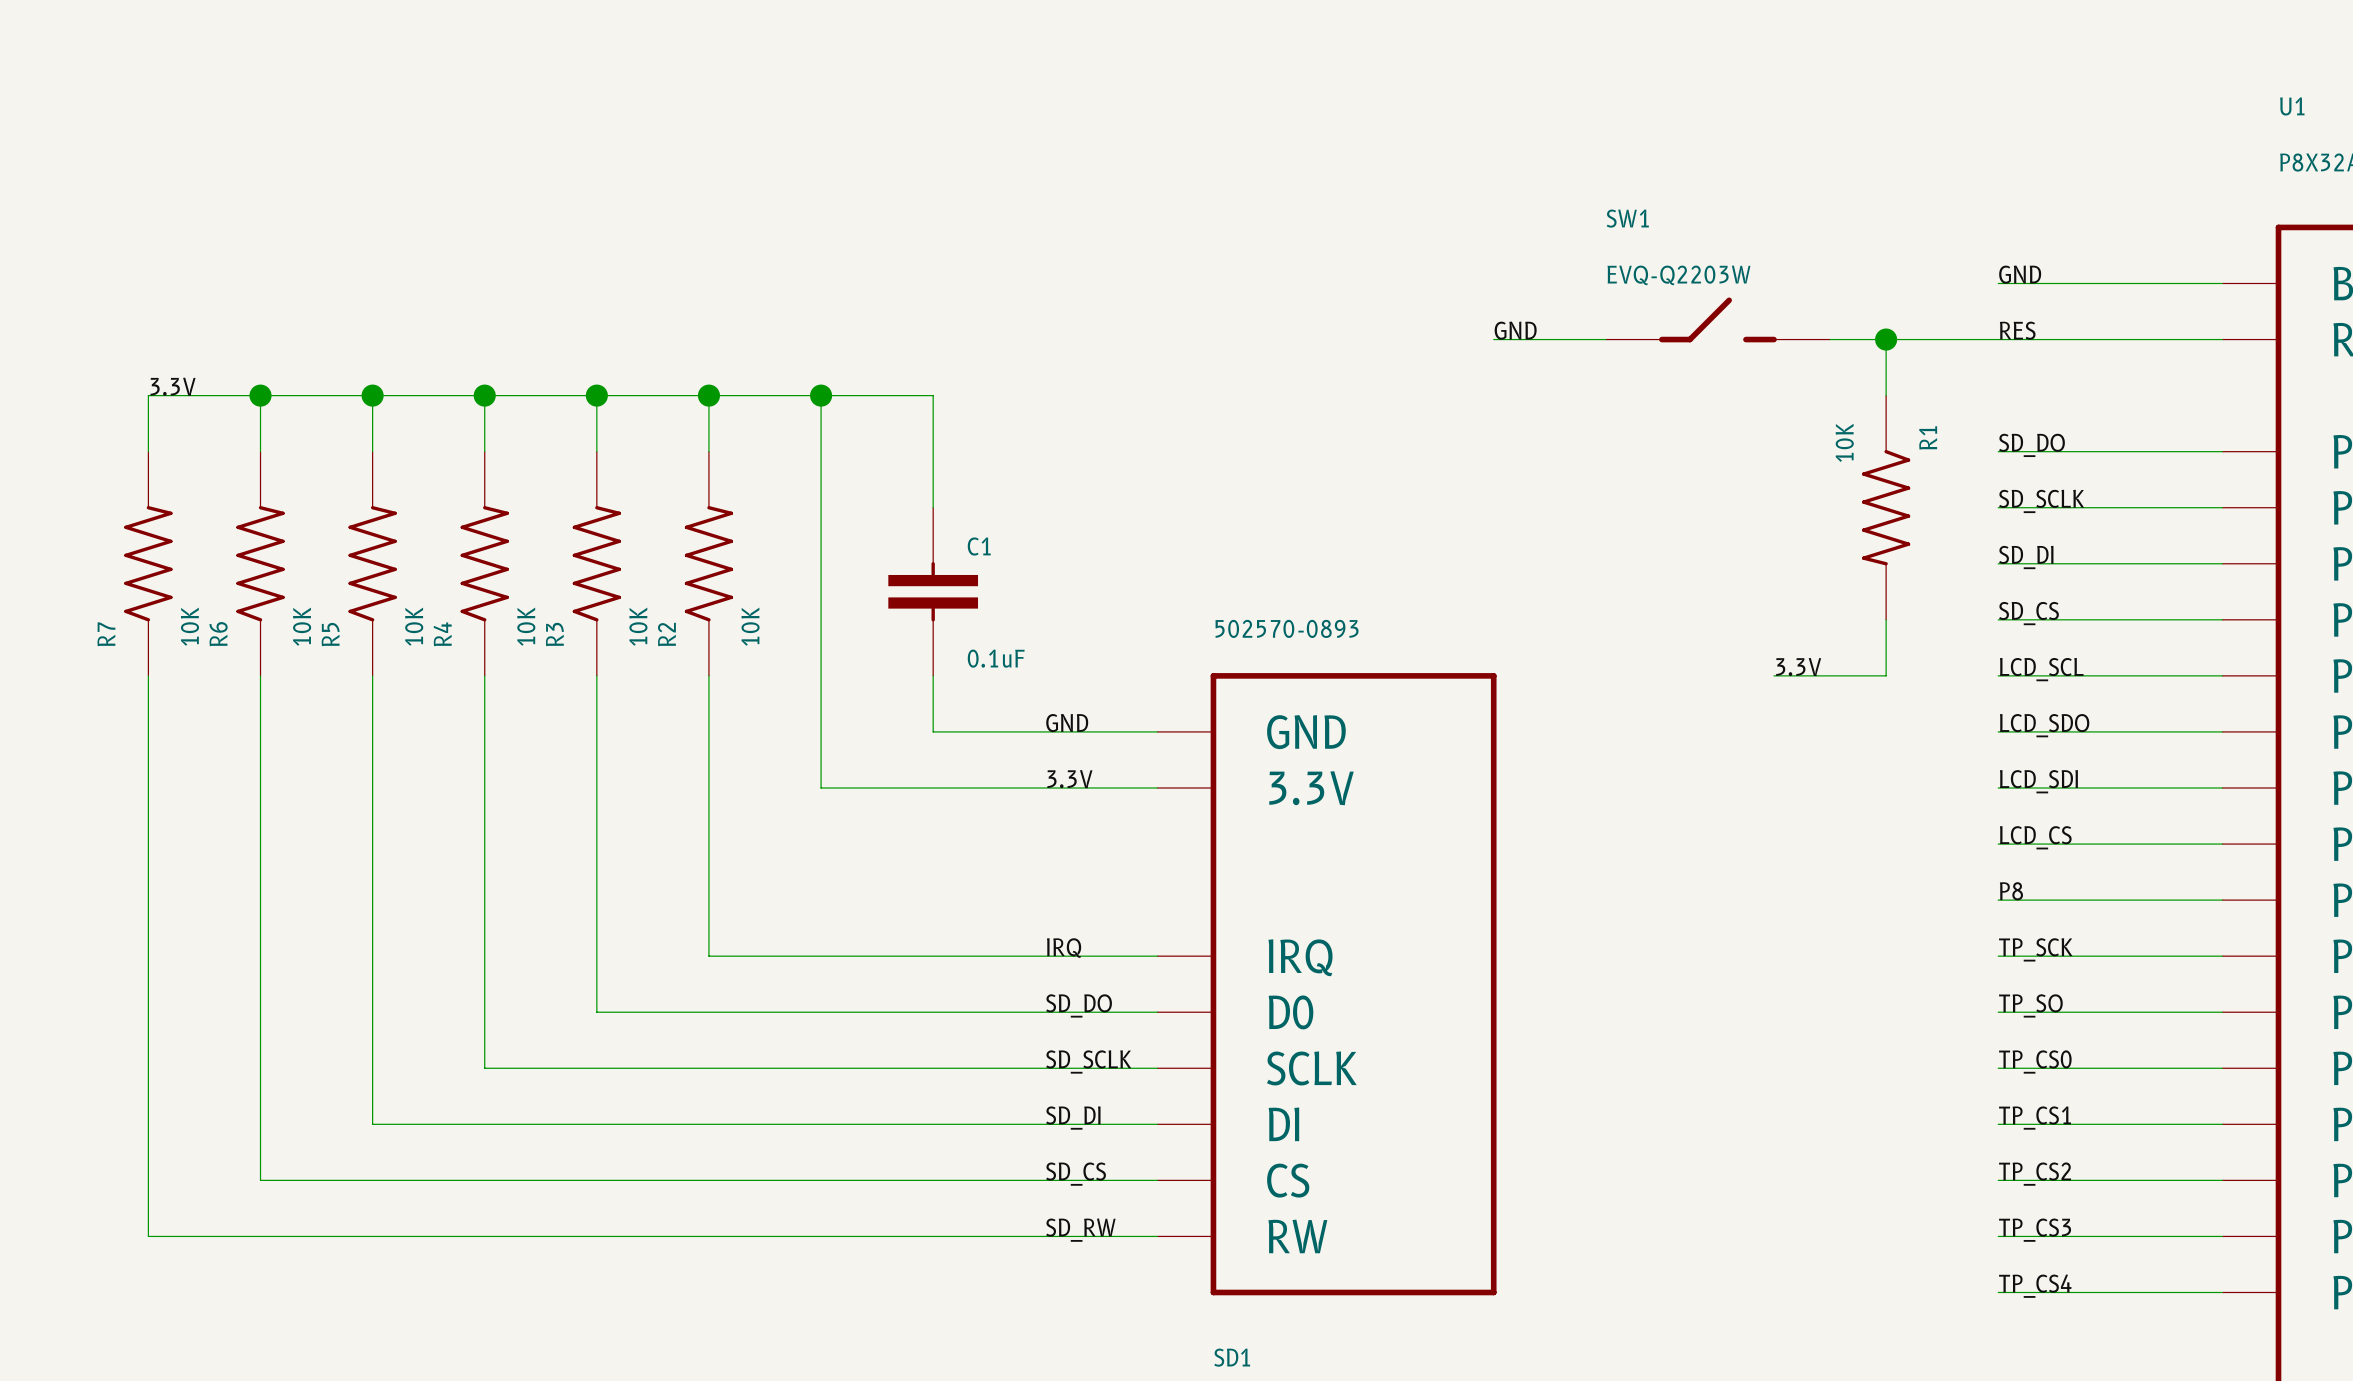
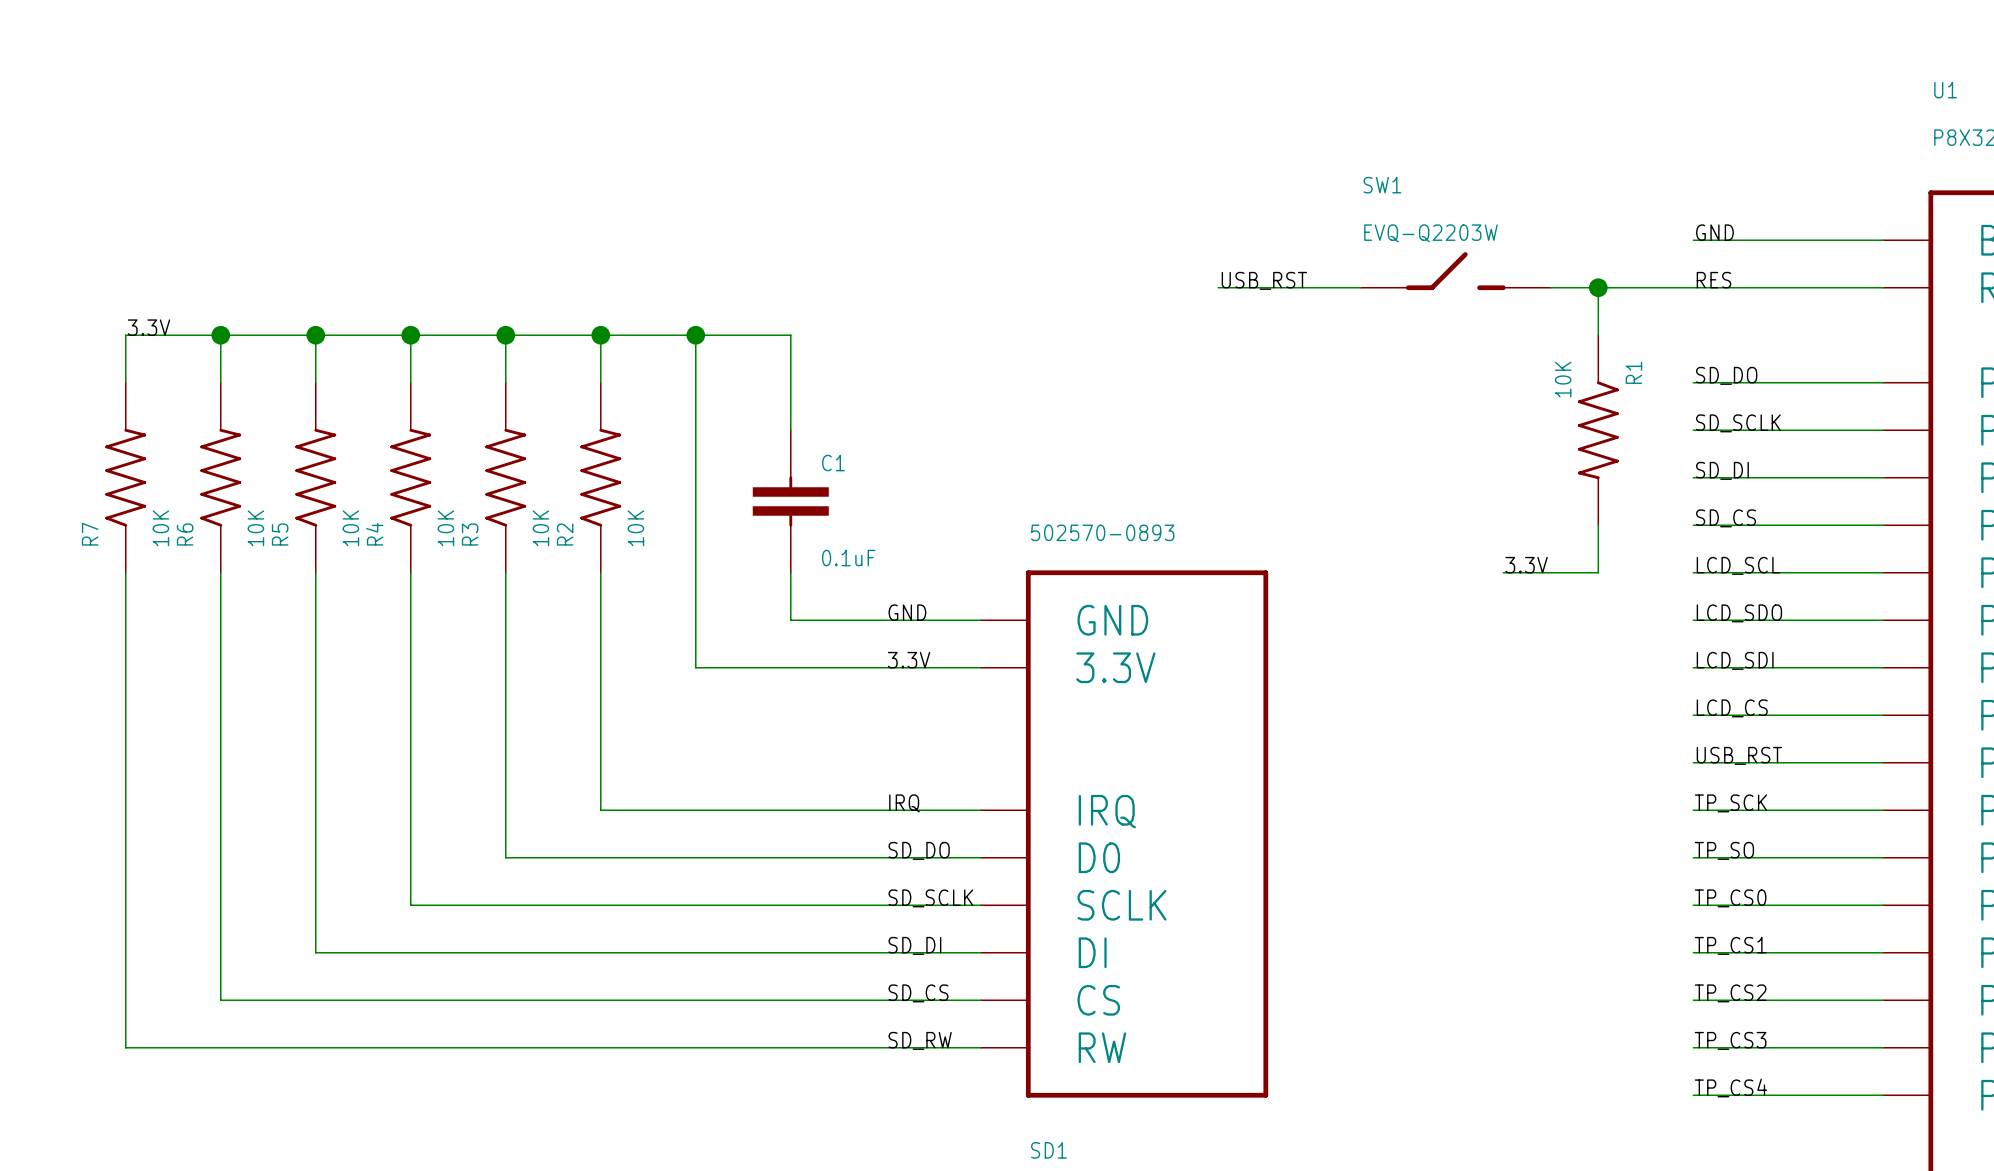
label: GND (1515, 330) -> none
label: none -> USB_RST (1264, 280)
wire: none -> (1218, 287) (1265, 287)
label: P8 (2011, 891) -> USB_RST (1739, 755)

